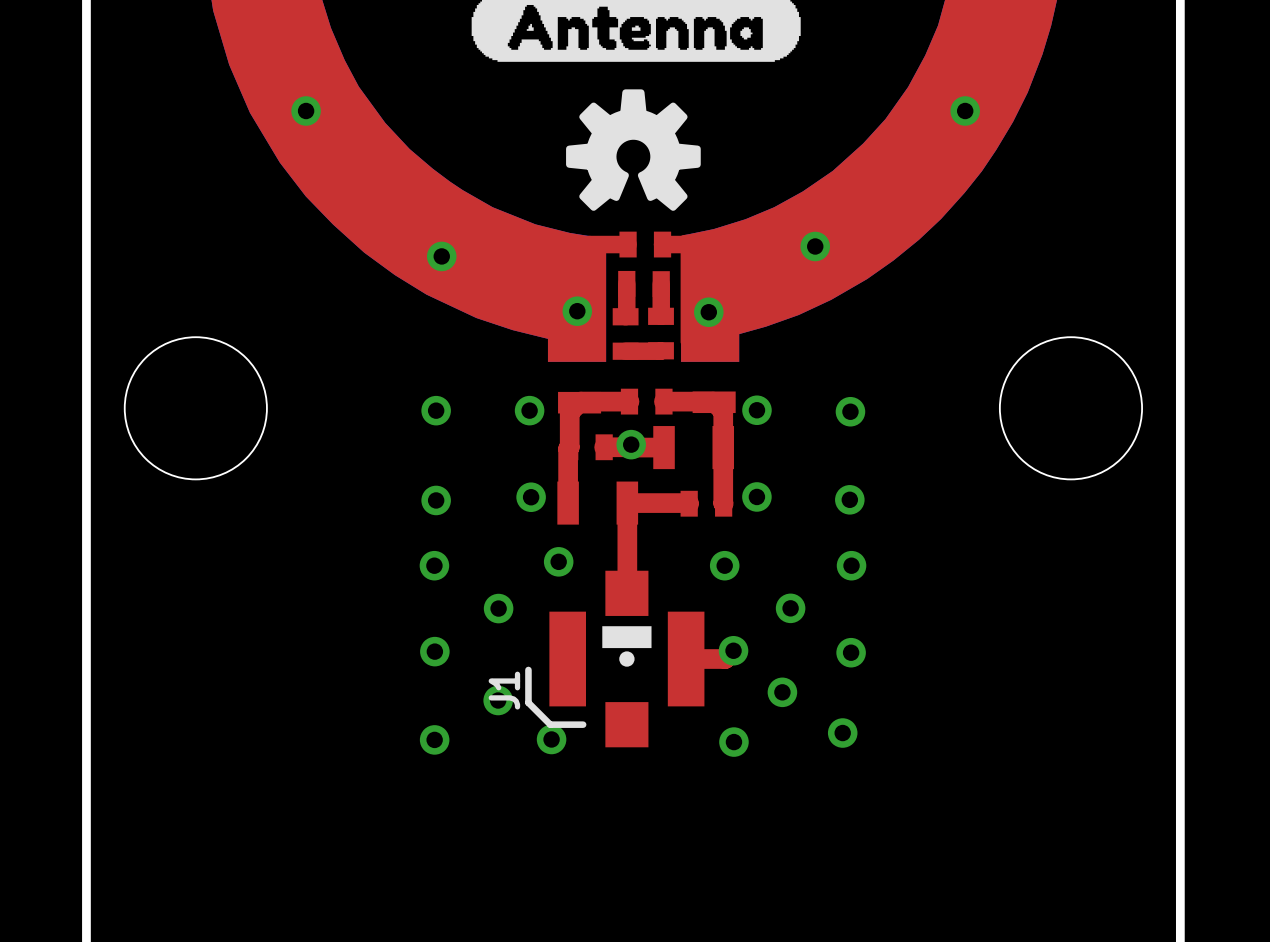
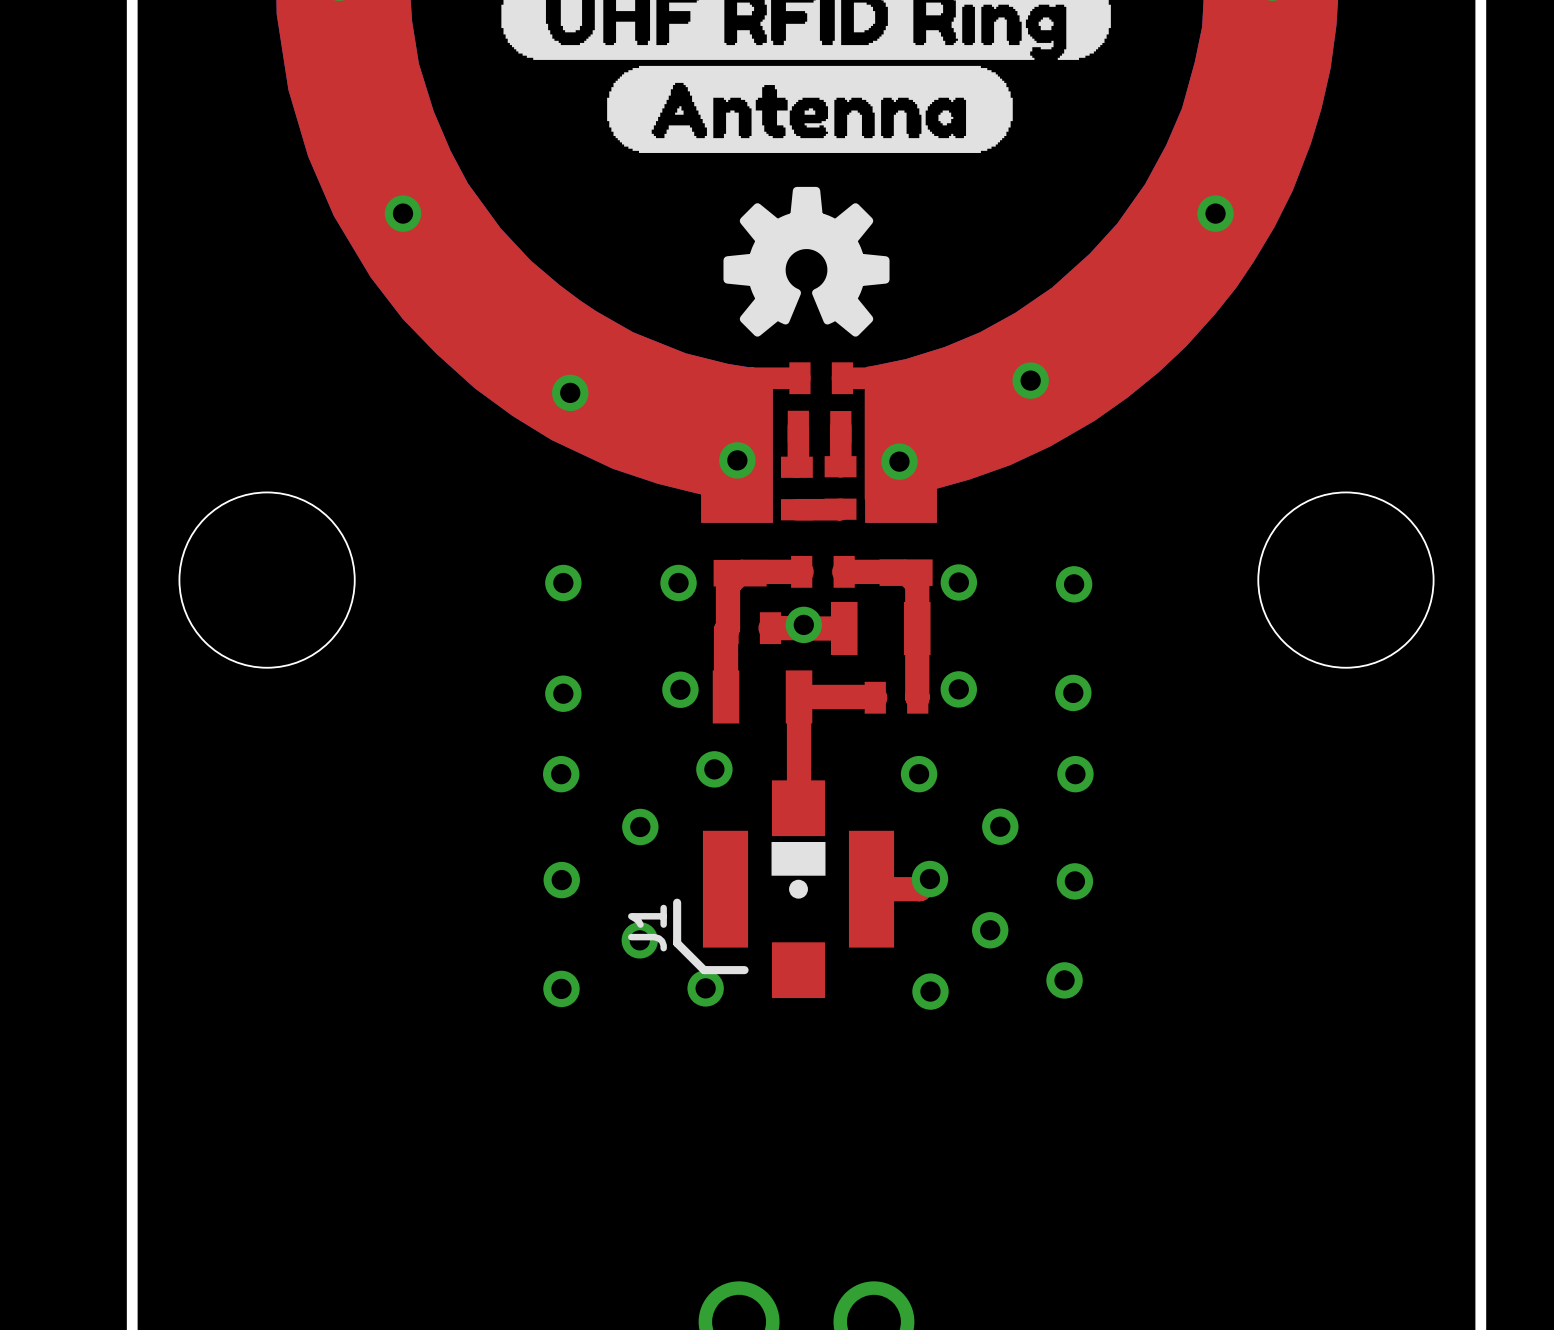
J1 footprint: [525, 570, 705, 748] -> [673, 780, 895, 999]

